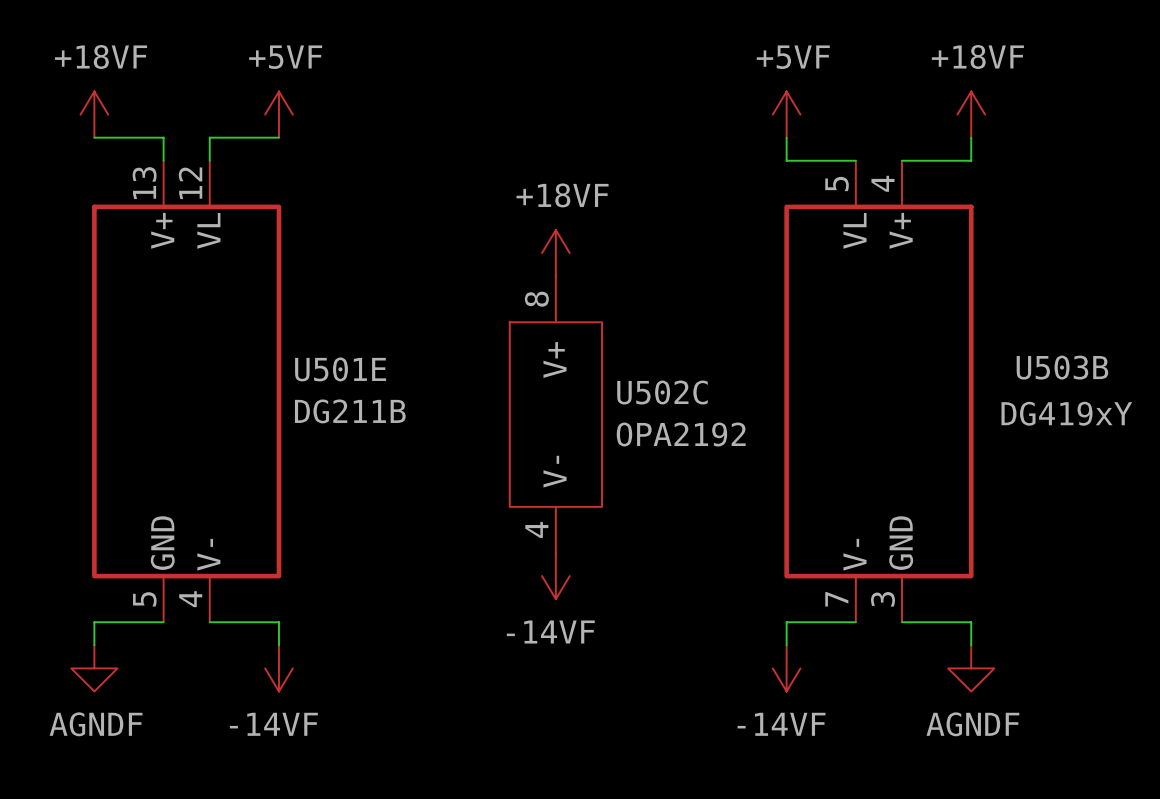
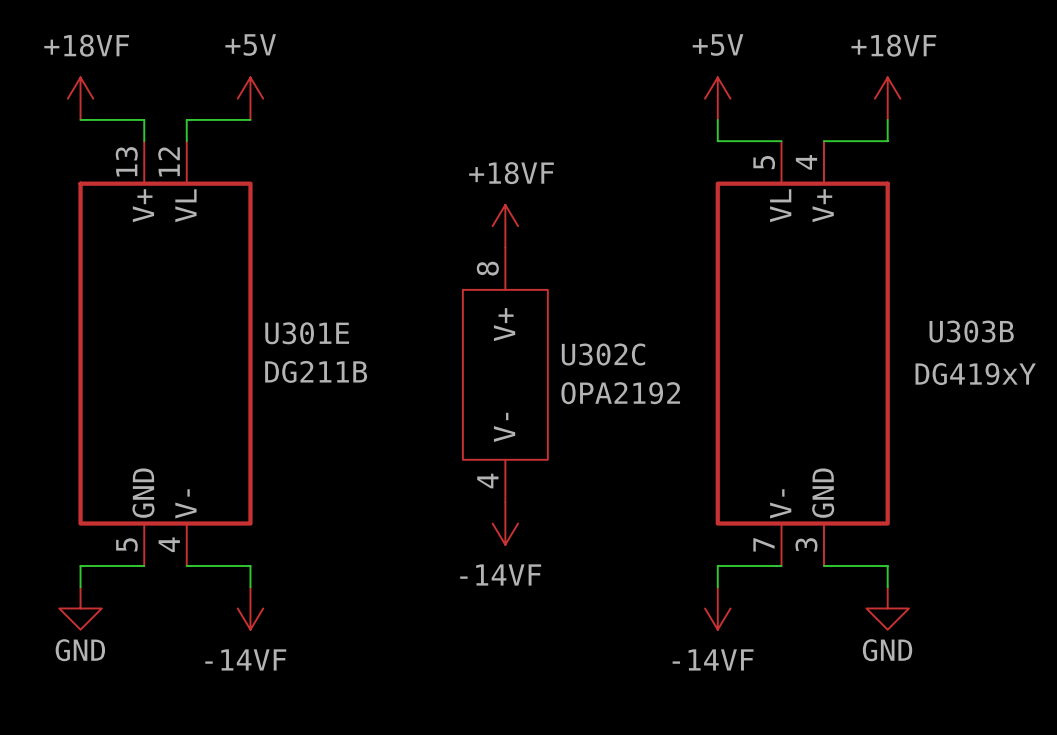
power symbol: +5VF (278, 114) -> +5V (250, 98)
power symbol: +5VF (786, 114) -> +5V (717, 98)
U503B name: U503B (1062, 367) -> U303B (971, 331)
U501E name: U501E (340, 369) -> U301E (307, 333)
U502C name: U502C (662, 392) -> U302C (603, 354)
power symbol: AGNDF (94, 668) -> GND (80, 608)
power symbol: AGNDF (971, 668) -> GND (887, 608)

